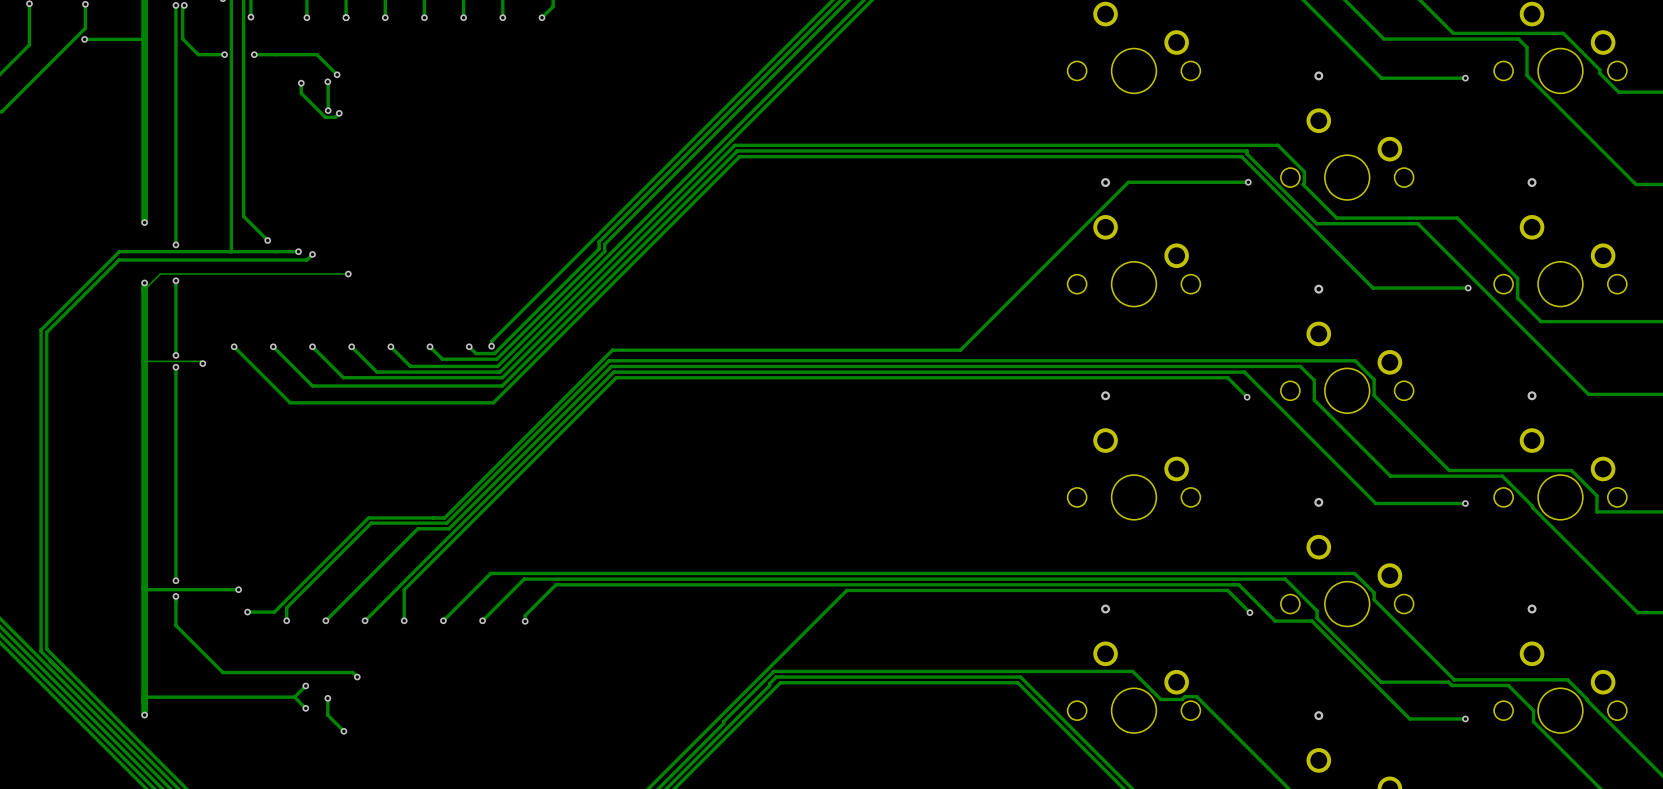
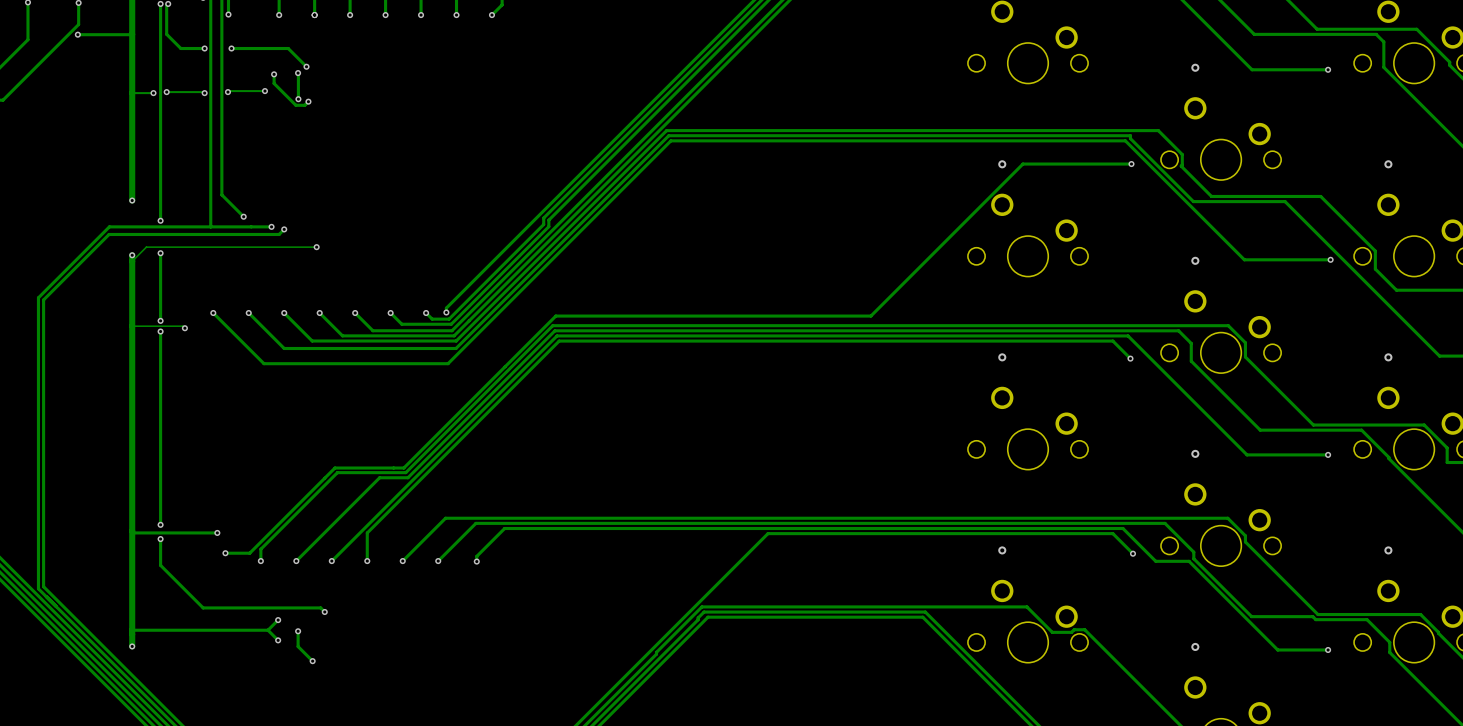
track: none -> (264, 91) (227, 92)
via: none -> (264, 91)
track: none -> (166, 92) (204, 93)
via: none -> (166, 92)
via: none -> (227, 92)
track: none -> (153, 93) (132, 93)
via: none -> (153, 93)
via: none -> (204, 93)

